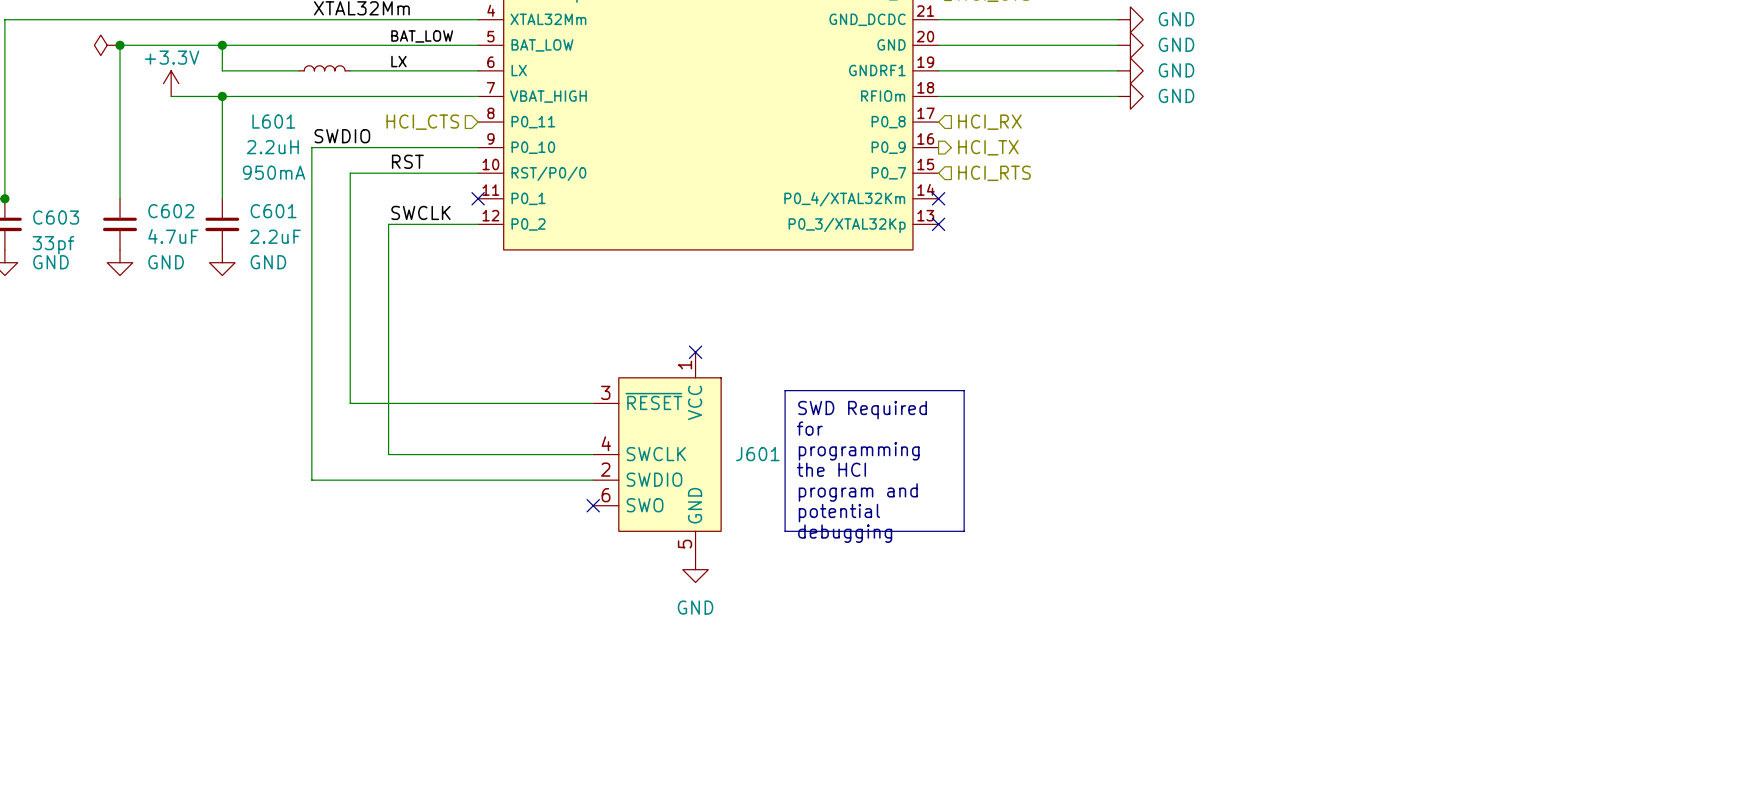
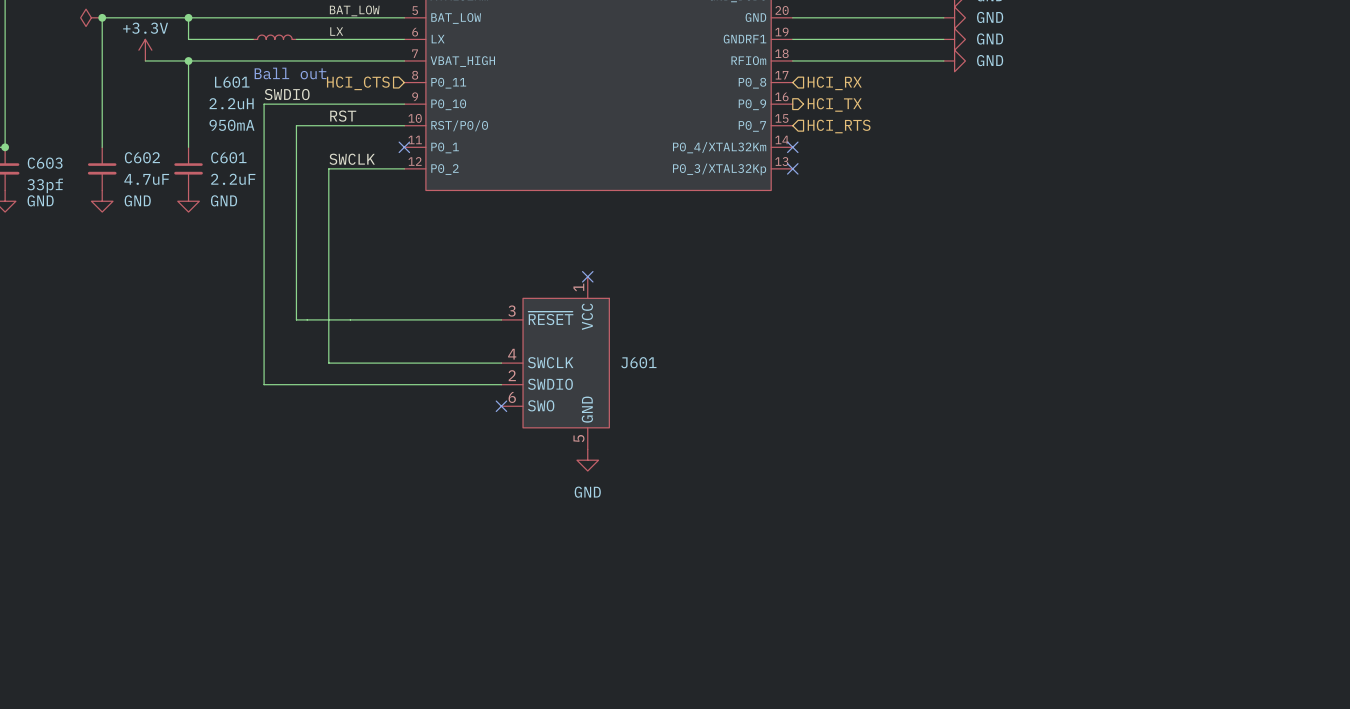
text: none -> Ball out (290, 73)
line: (785, 390) (964, 390) (964, 531) (785, 531) (785, 390) -> none
text: SWD Required (862, 410) -> none
text: for (809, 428) -> none
text: programming (859, 451) -> none
text: the HCI (831, 469) -> none
text: program and (858, 492) -> none
text: potential (839, 513) -> none
text: debugging (845, 533) -> none

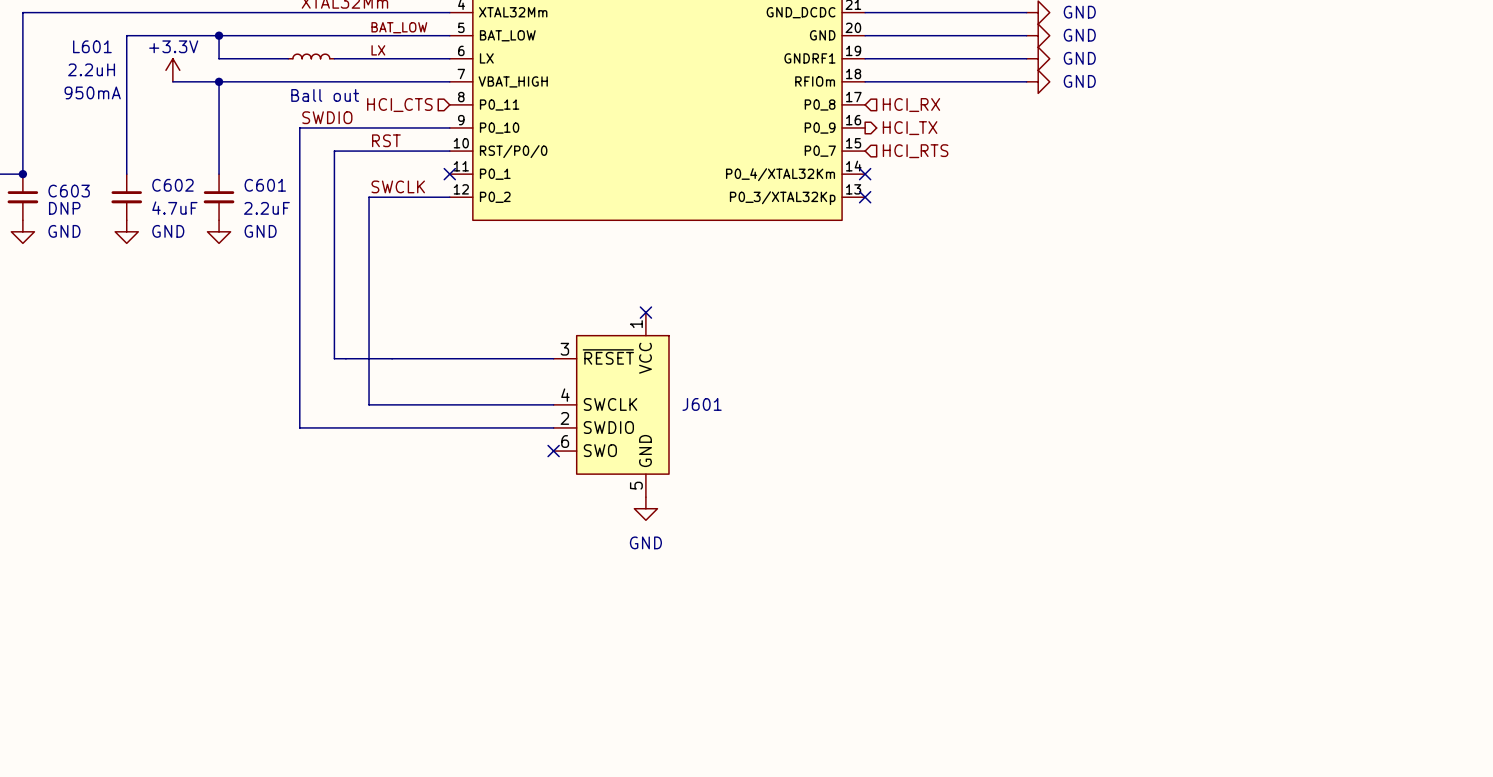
power symbol: (91, 17) -> none
junction: (102, 17) -> none
L601 name position: L601 (232, 82) -> L601 (92, 46)
L601 text position: 2.2uH (231, 103) -> 2.2uH (91, 69)
L601 text position: 950mA (231, 125) -> 950mA (92, 92)
C603 text: 33pf (45, 185) -> DNP (64, 208)

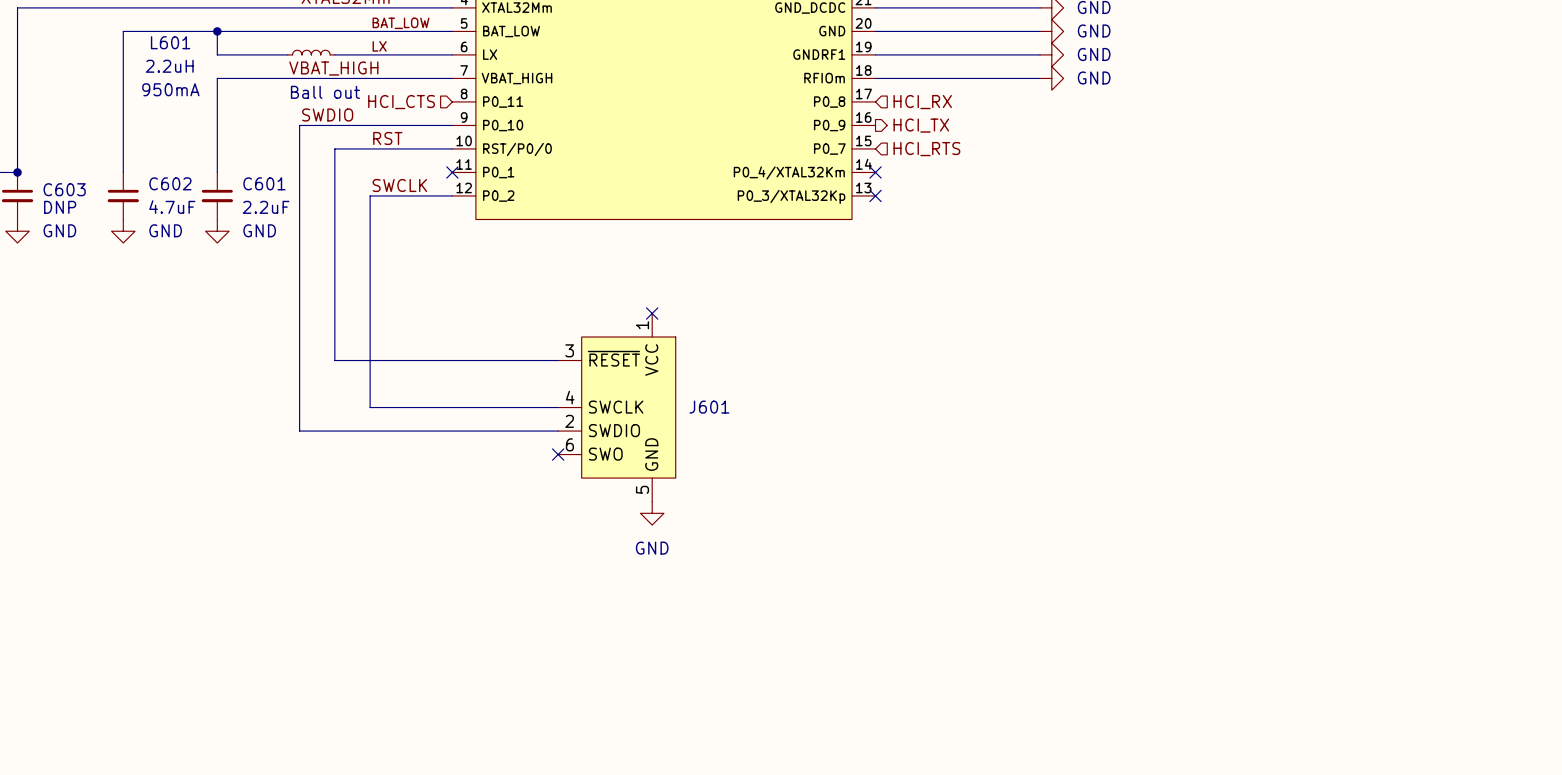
L601 name position: L601 (92, 46) -> L601 (170, 42)
L601 text position: 2.2uH (91, 69) -> 2.2uH (169, 66)
power symbol: +3.3V (172, 70) -> none
label: none -> VBAT_HIGH (333, 68)
wire: (172, 81) (219, 81) -> none
junction: (219, 81) -> none
L601 text position: 950mA (92, 92) -> 950mA (170, 89)

